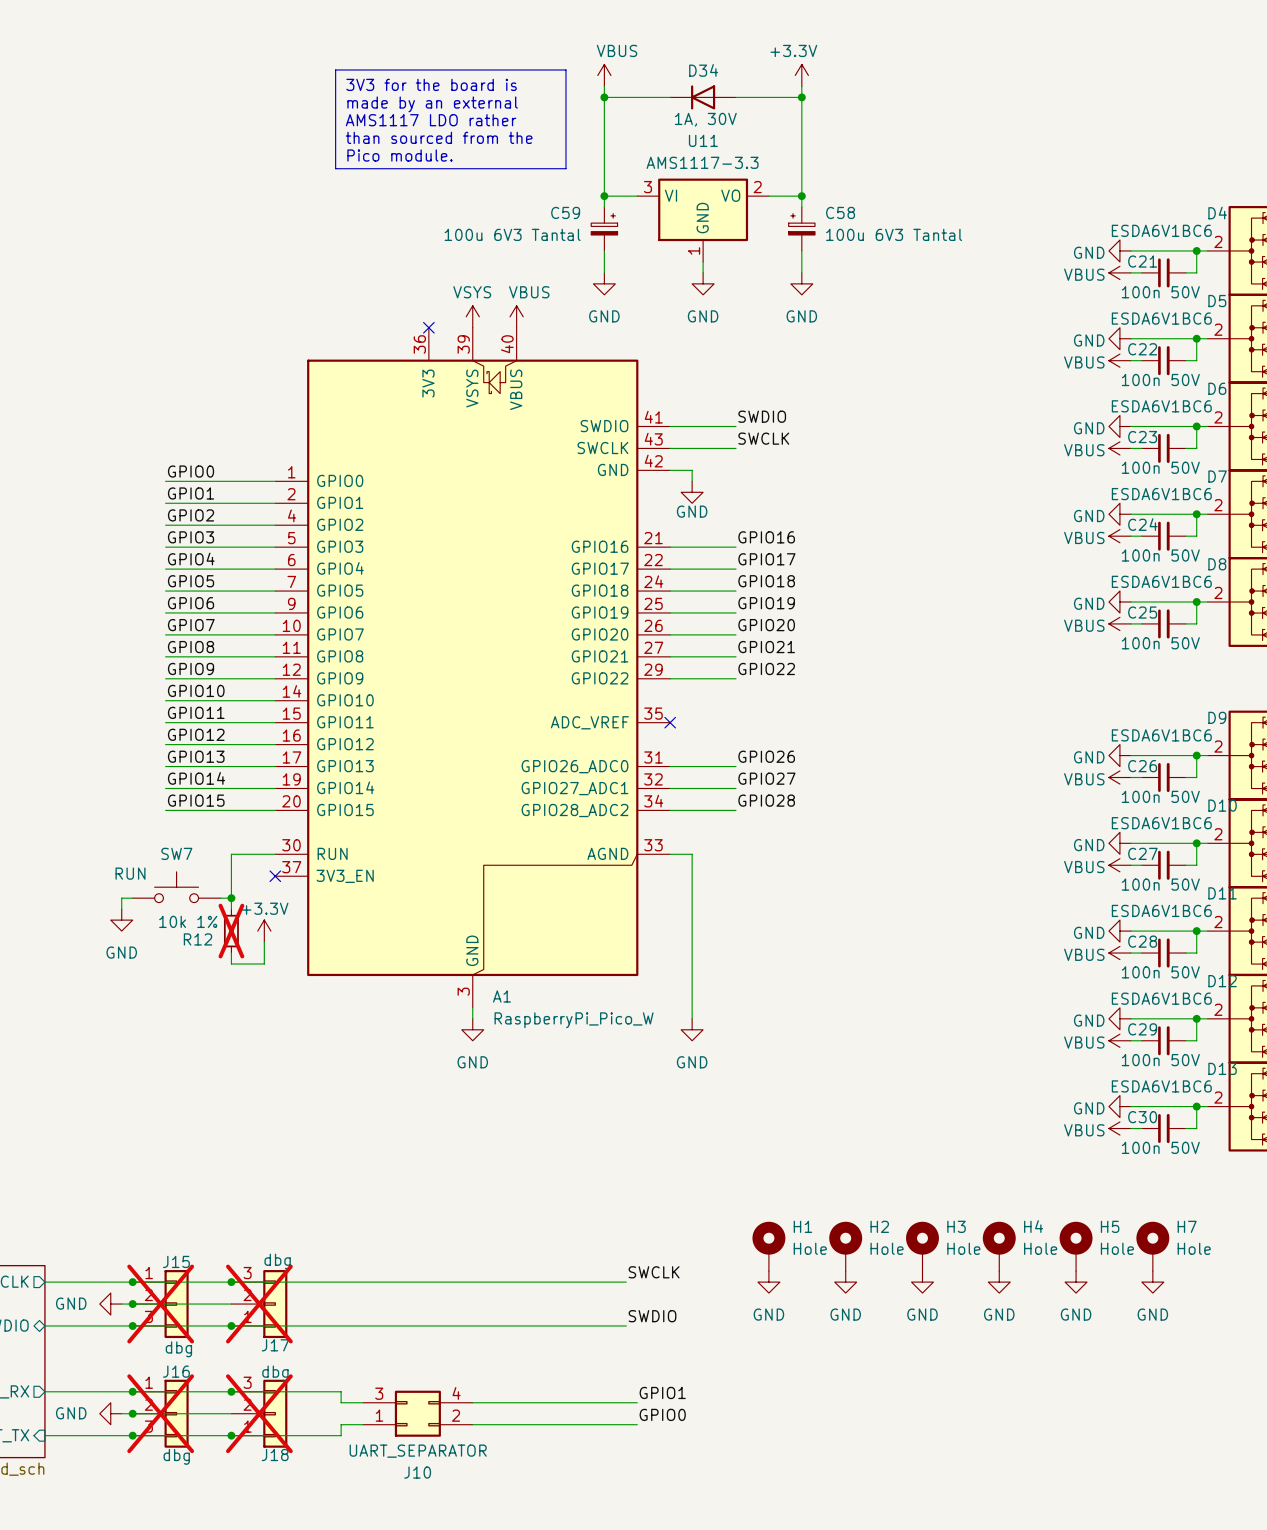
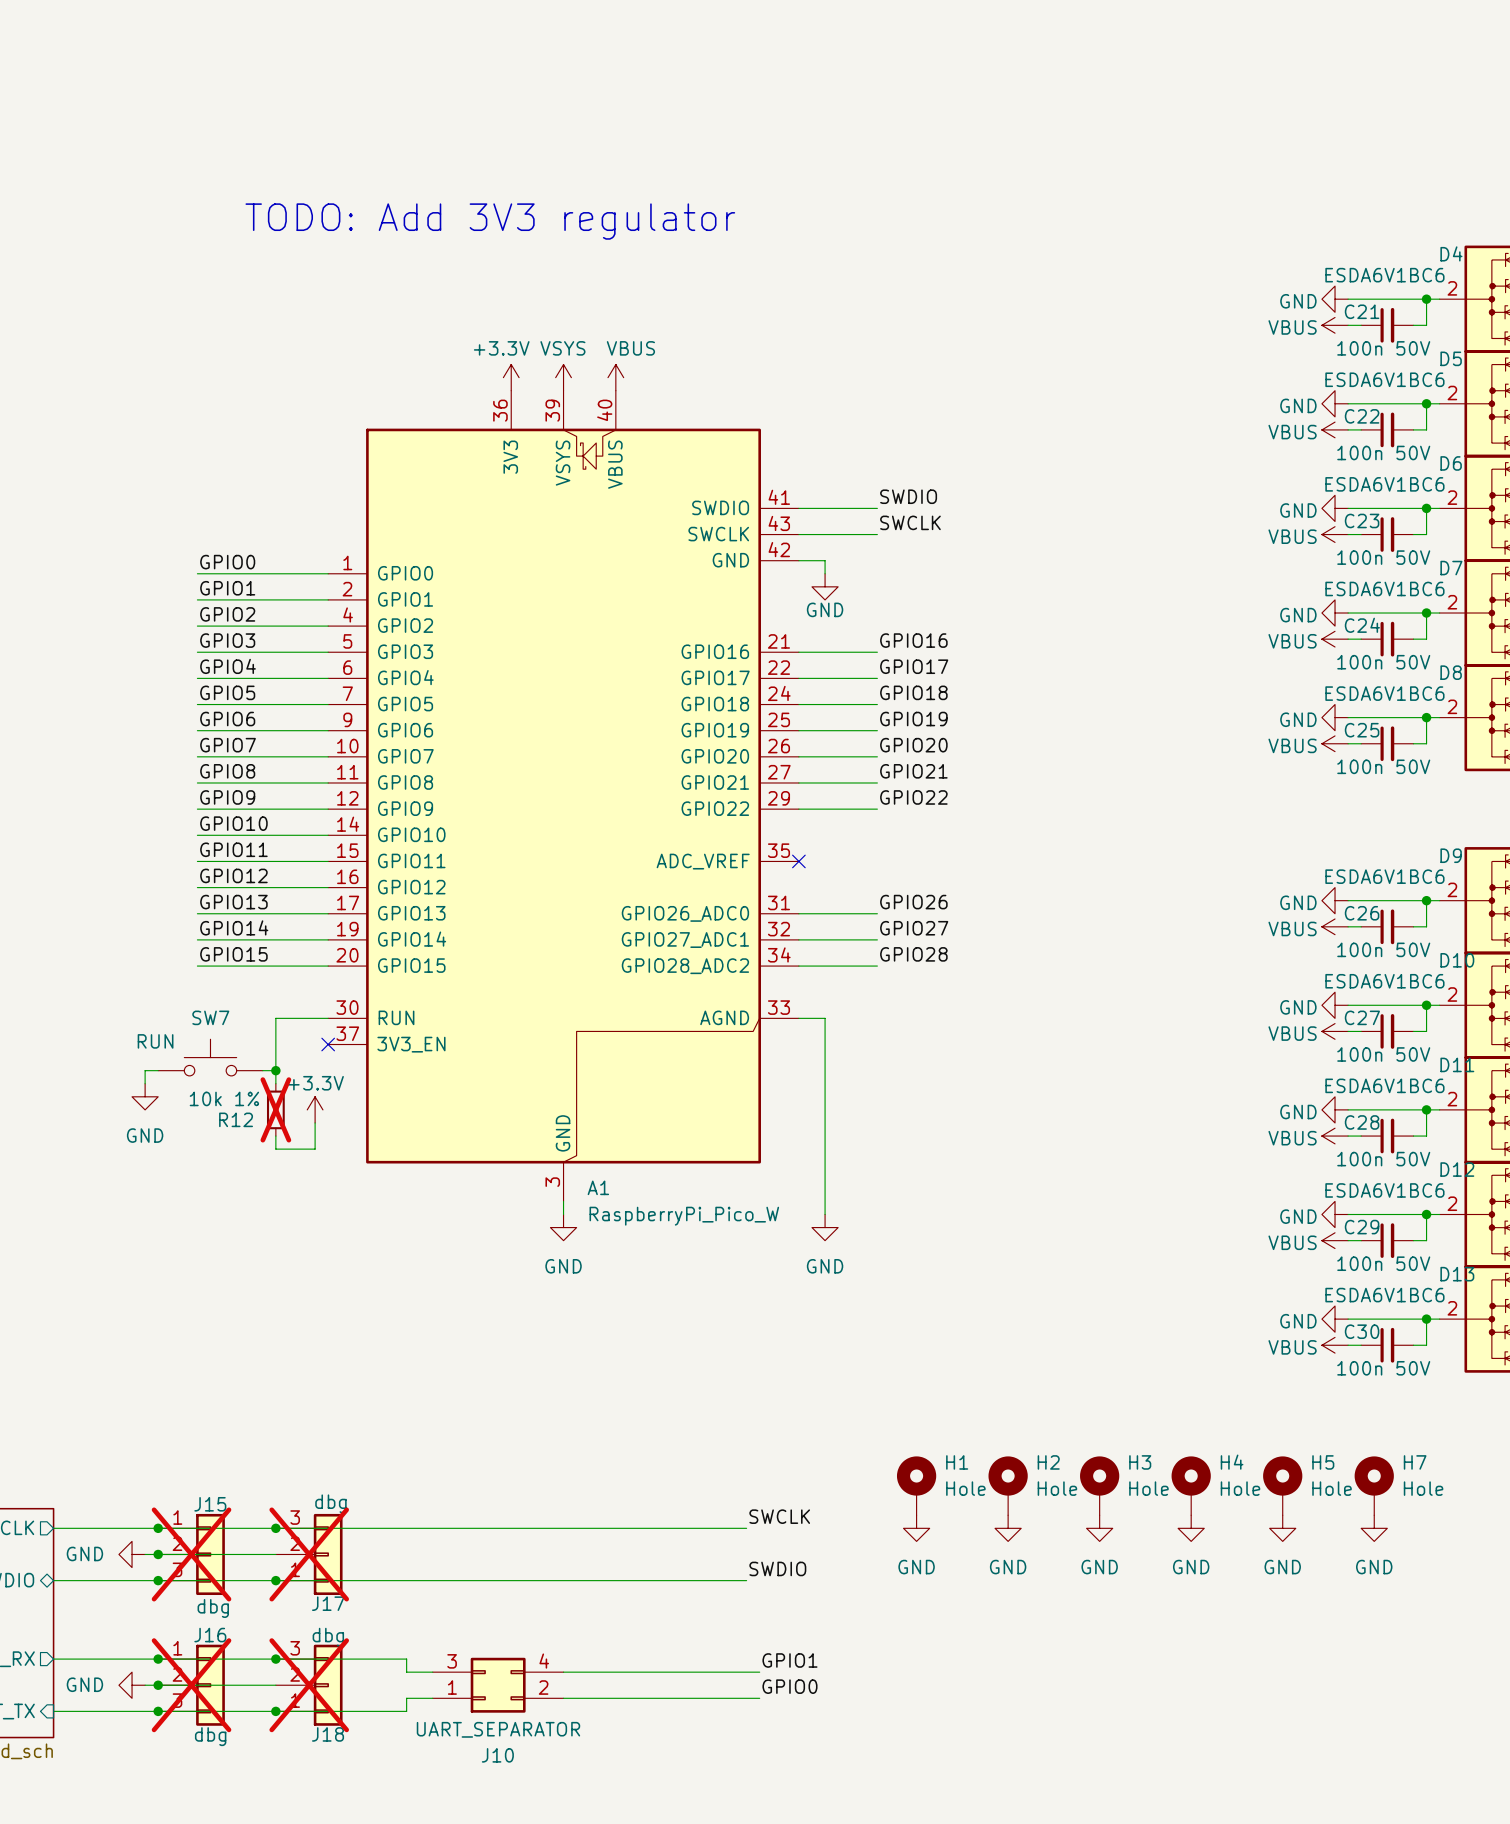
line: (335, 69) (565, 69) (565, 168) (335, 168) (335, 69) -> none
power symbol: VBUS (604, 75) -> none
power symbol: +3.3V (801, 75) -> none
text: 3V3 for the board is (431, 84) -> none
wire: (604, 86) (604, 207) -> none
wire: (801, 86) (801, 207) -> none
wire: (604, 97) (670, 97) -> none
junction: (604, 97) -> none
D34: 1A, 30V (703, 97) -> none
wire: (736, 97) (801, 97) -> none
junction: (801, 97) -> none
text: made by an external (432, 104) -> none
text: AMS1117 LDO rather (431, 120) -> none
text: than sourced from the (439, 137) -> none
text: Pico module. (399, 155) -> none
text: none -> TODO: Add 3V3 regulator (490, 221)
wire: (604, 196) (637, 196) -> none
junction: (604, 196) -> none
wire: (768, 196) (801, 196) -> none
junction: (801, 196) -> none
U11: AMS1117-3.3 (703, 220) -> none
C59: 100u 6V3 Tantal (604, 229) -> none
C58: 100u 6V3 Tantal (801, 229) -> none
wire: (604, 250) (604, 272) -> none
wire: (801, 250) (801, 272) -> none
wire: (703, 261) (703, 272) -> none
power symbol: GND (604, 283) -> none
power symbol: GND (703, 283) -> none
power symbol: GND (801, 283) -> none
power symbol: none -> +3.3V (511, 377)
no-connect mark: (428, 327) -> none

